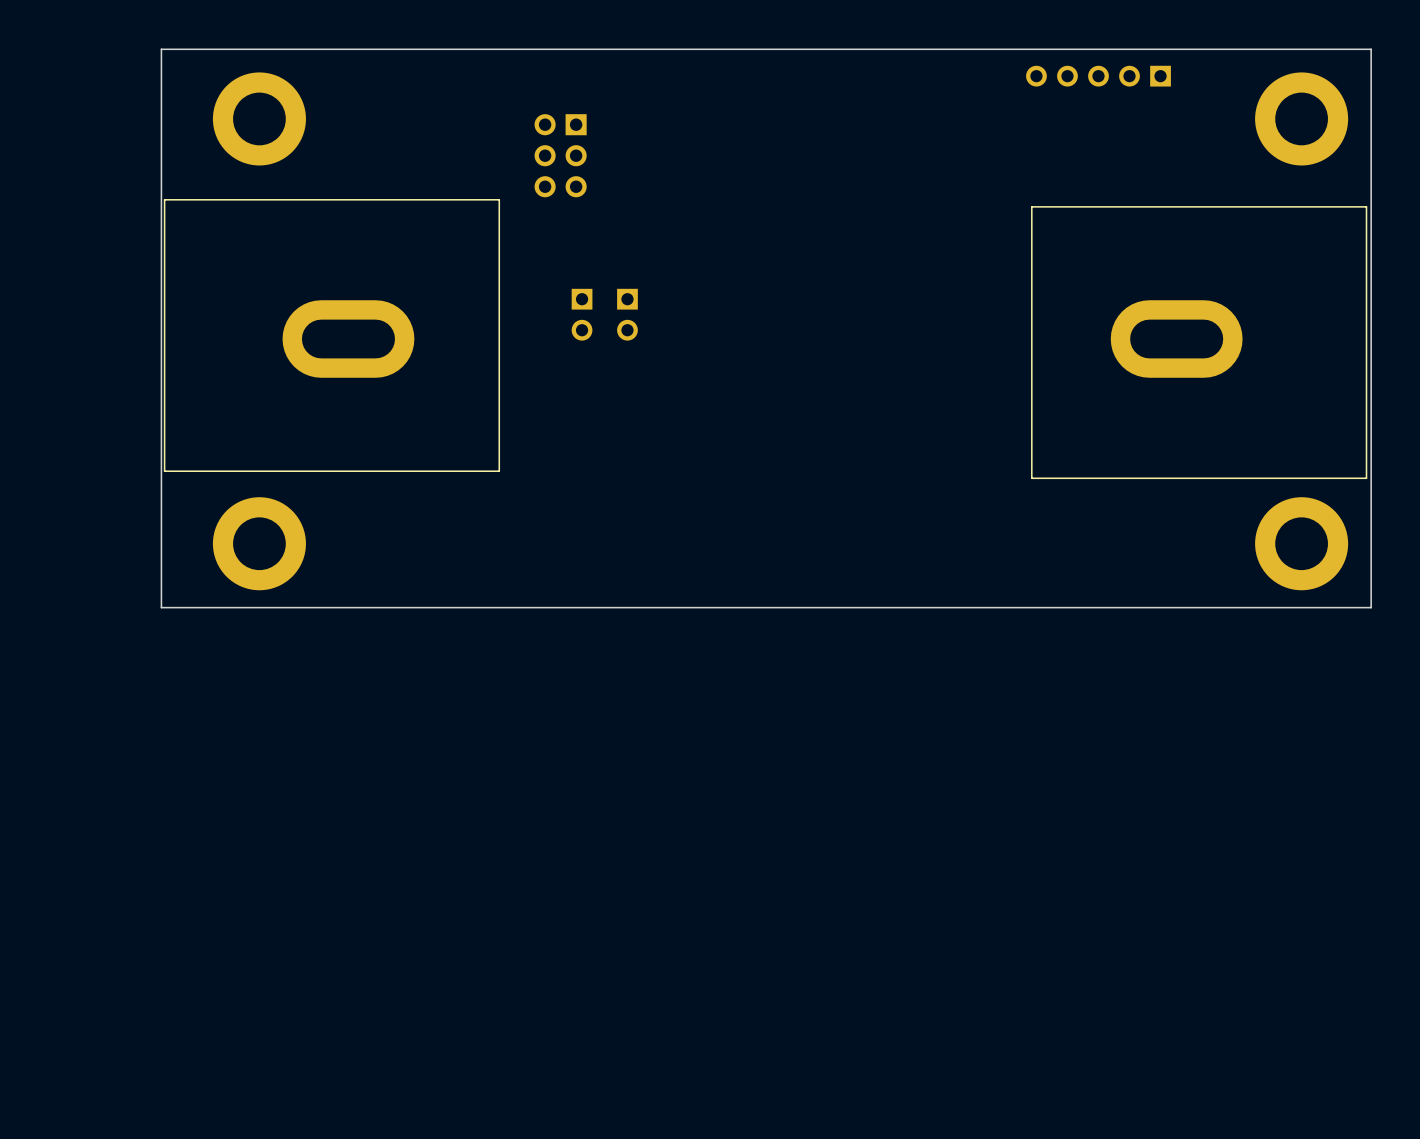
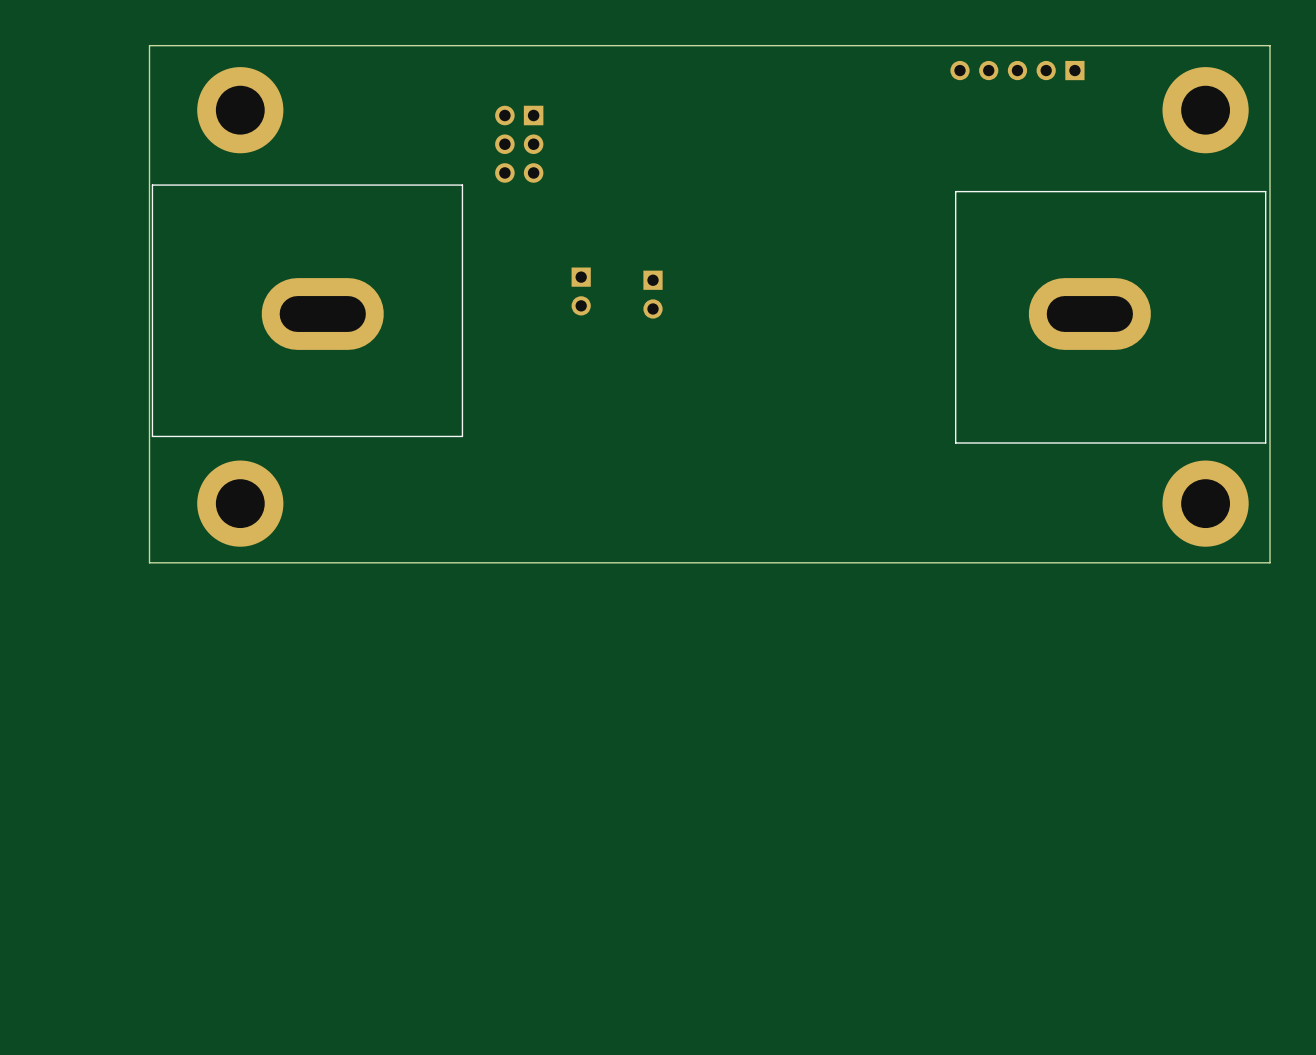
part position: (582, 314) -> (653, 294)

